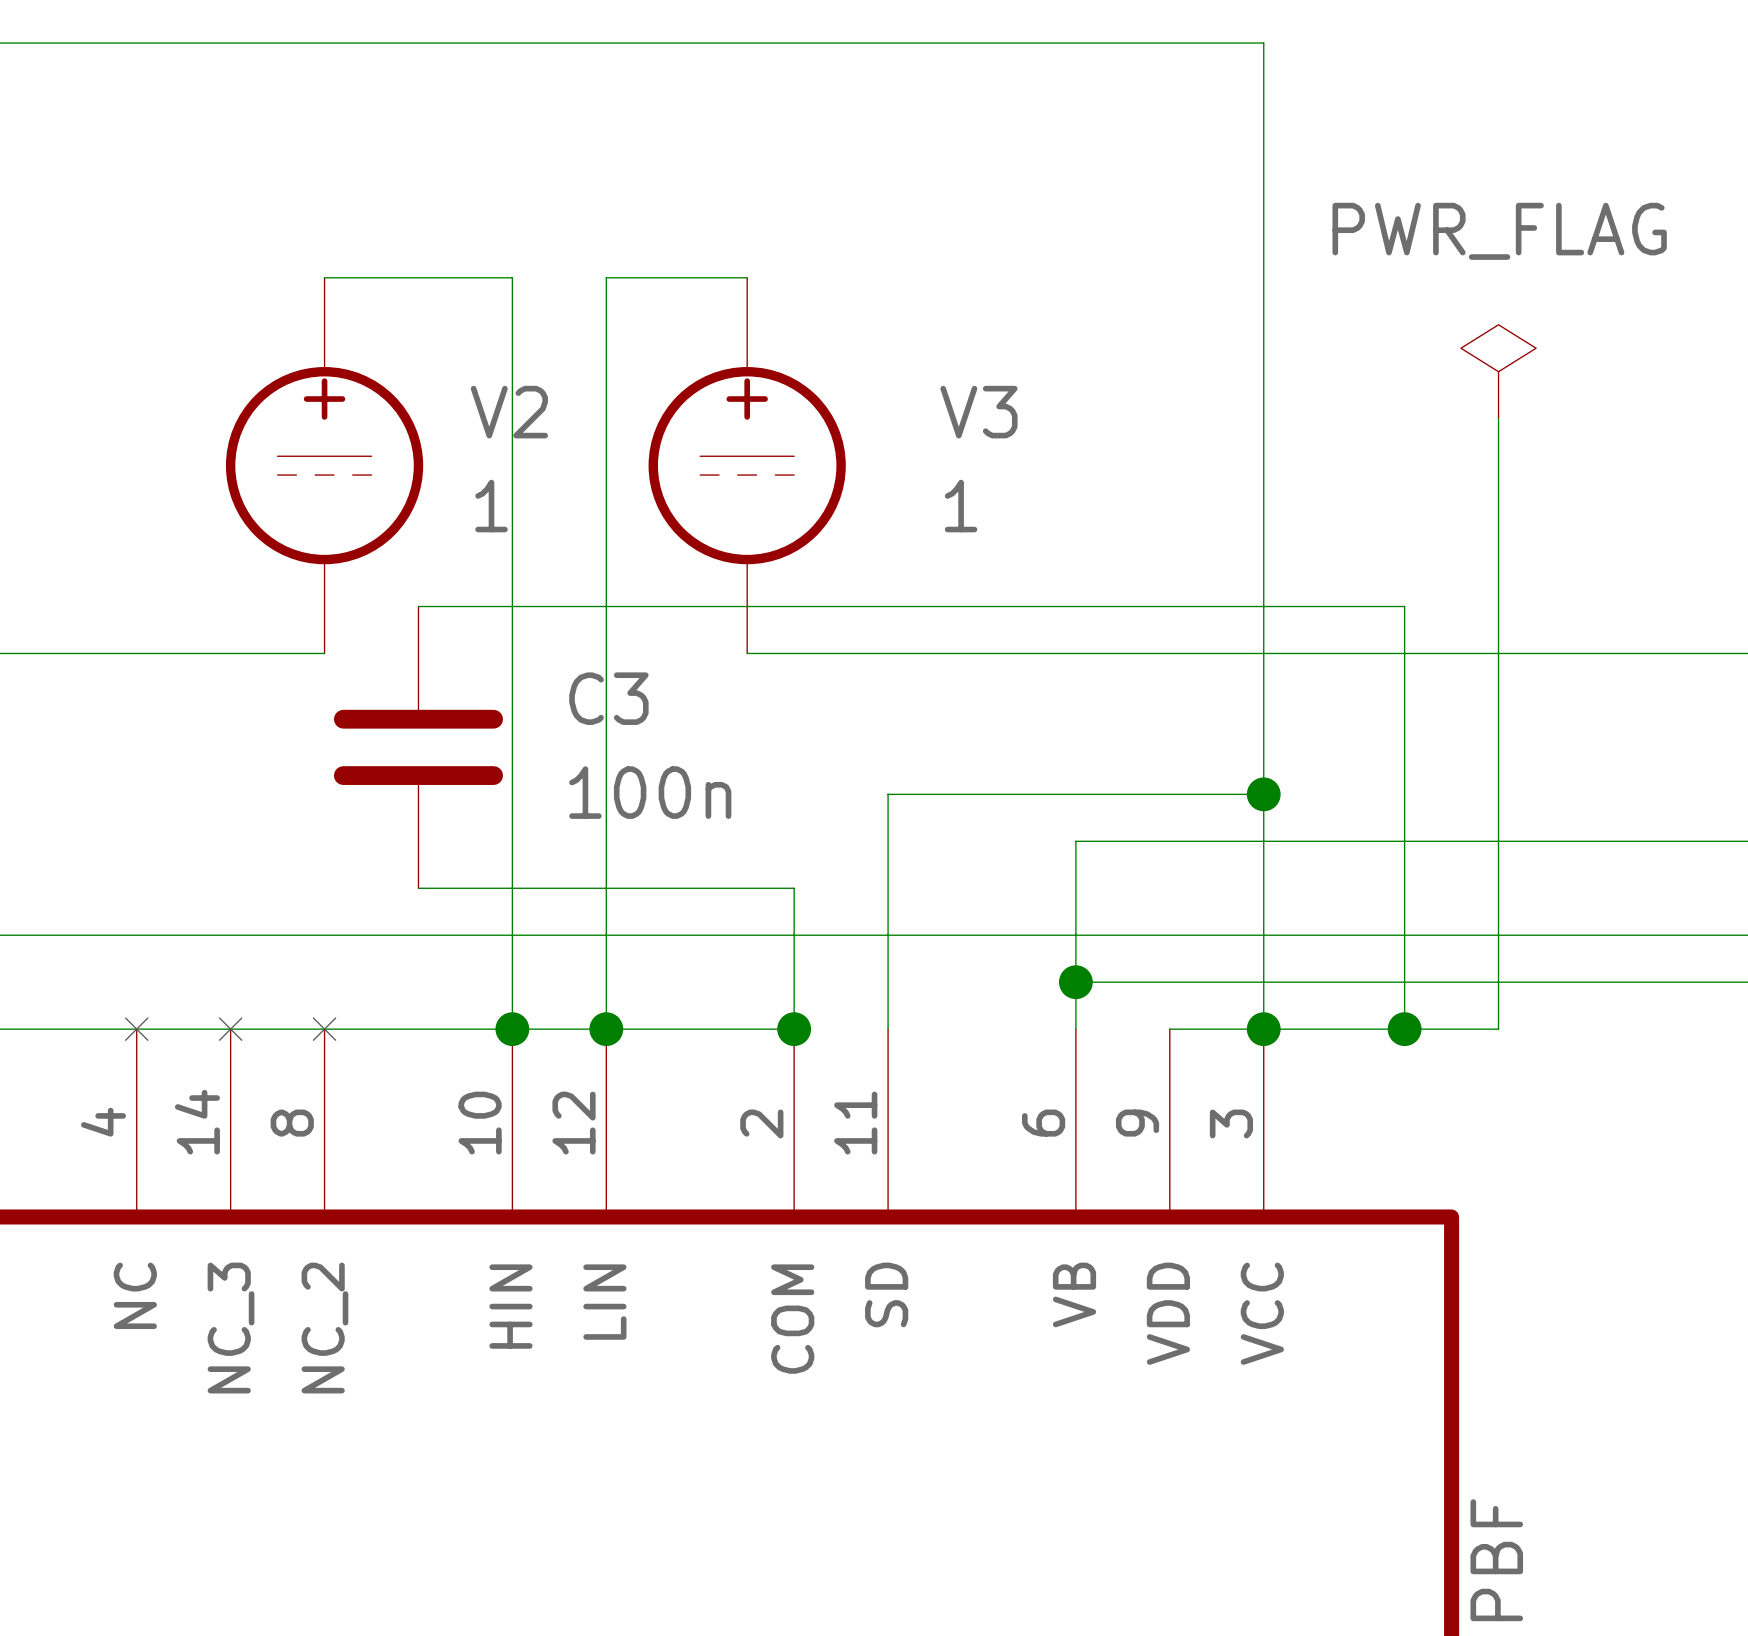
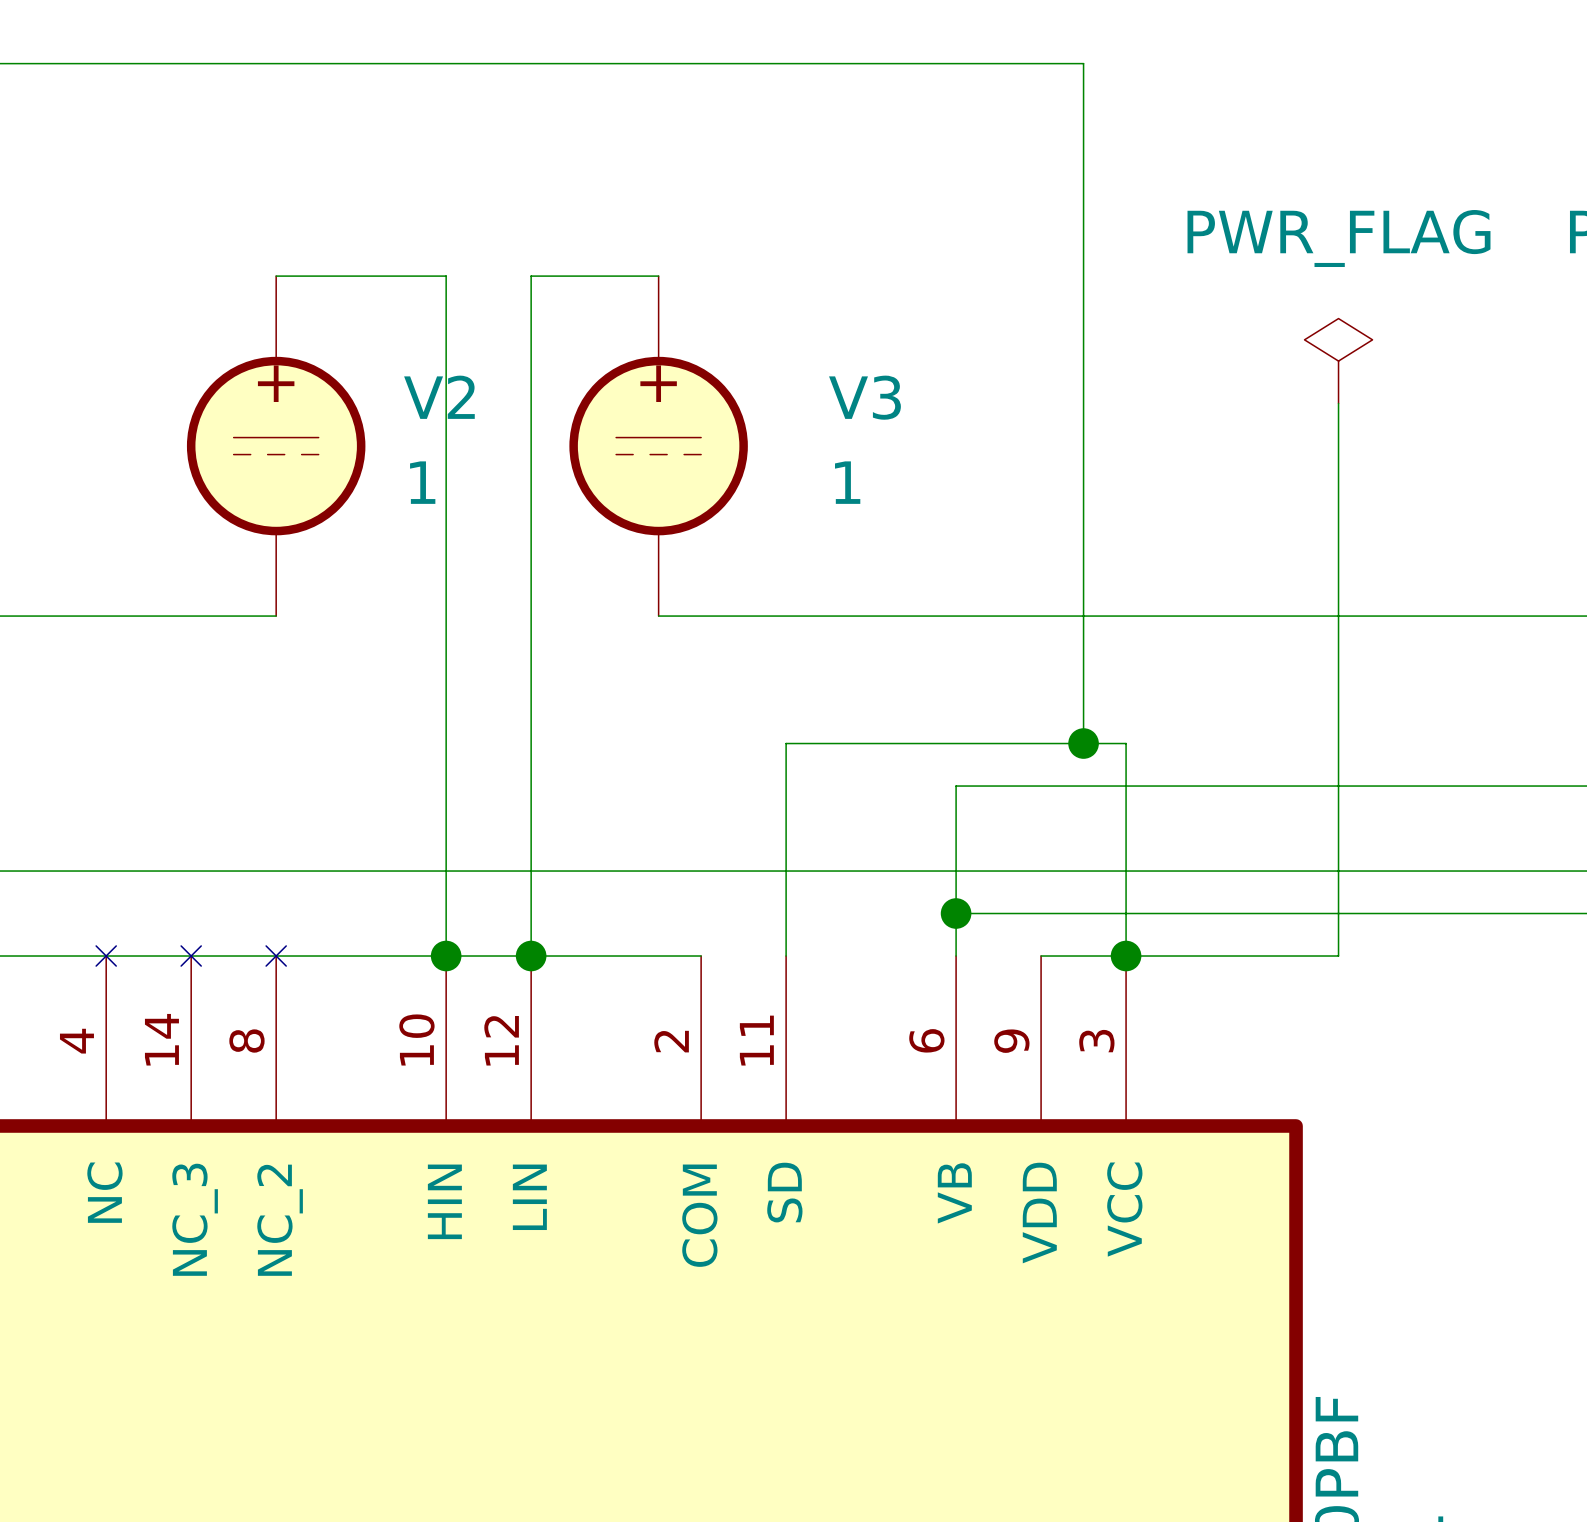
wire: (1216, 43) (1263, 43) (1263, 794) -> (1083, 63) (1083, 743)
wire: (418, 606) (1404, 606) (1404, 1029) -> none
C3: 100n (418, 747) -> none
junction position: (1263, 794) -> (1083, 743)
wire: (418, 888) (794, 888) (794, 1029) -> none
junction: (794, 1029) -> none
junction: (1404, 1029) -> none

